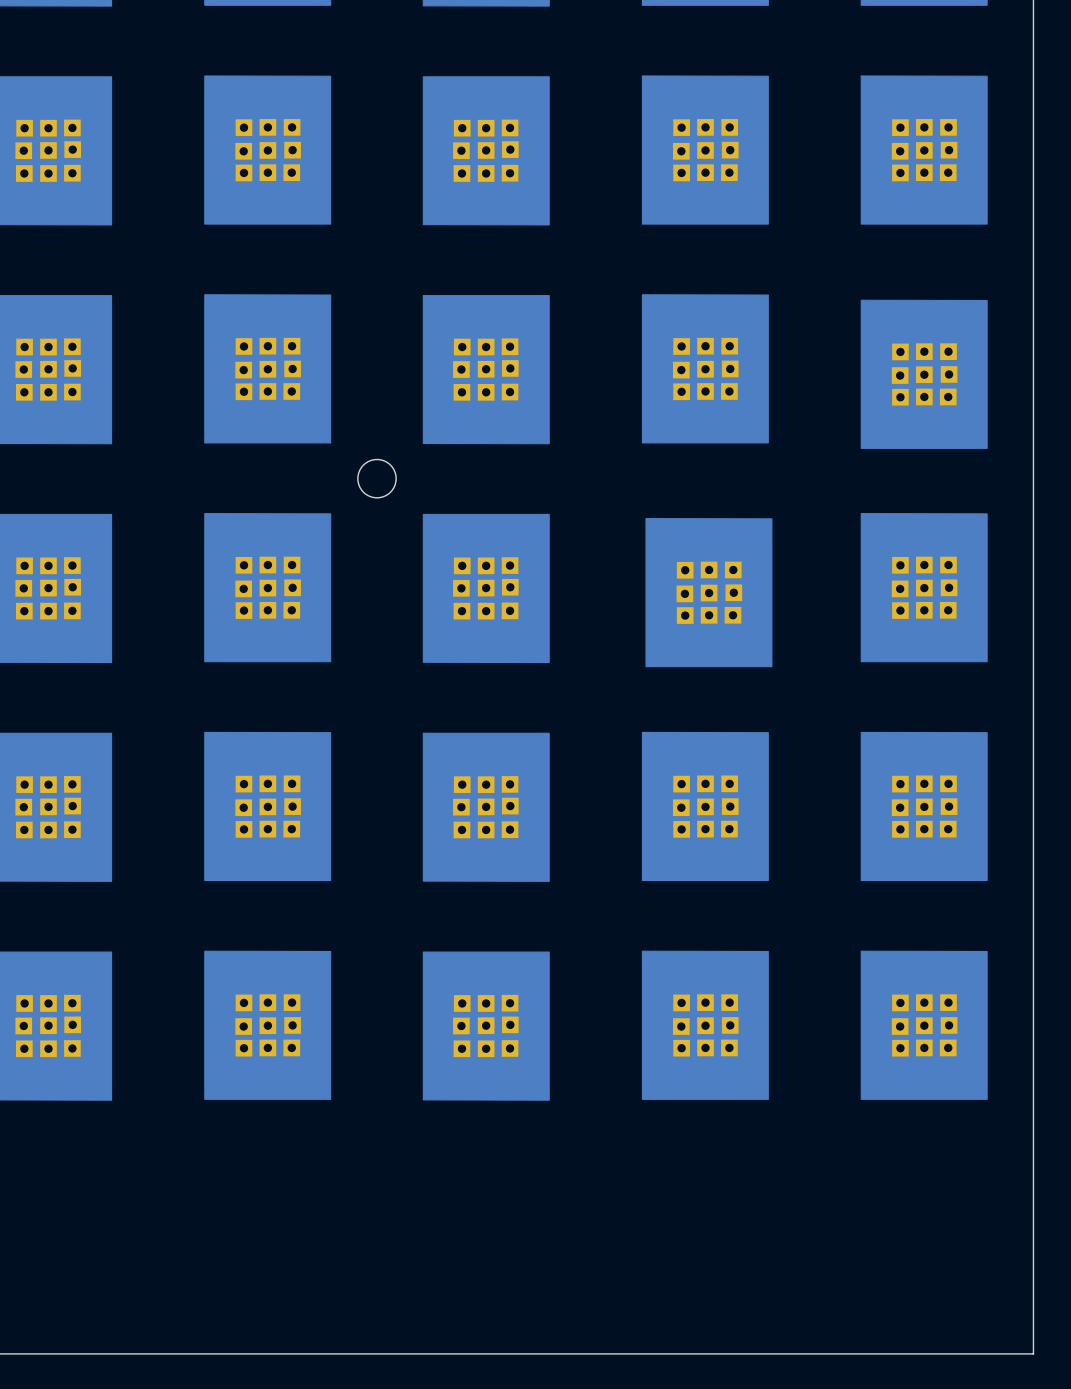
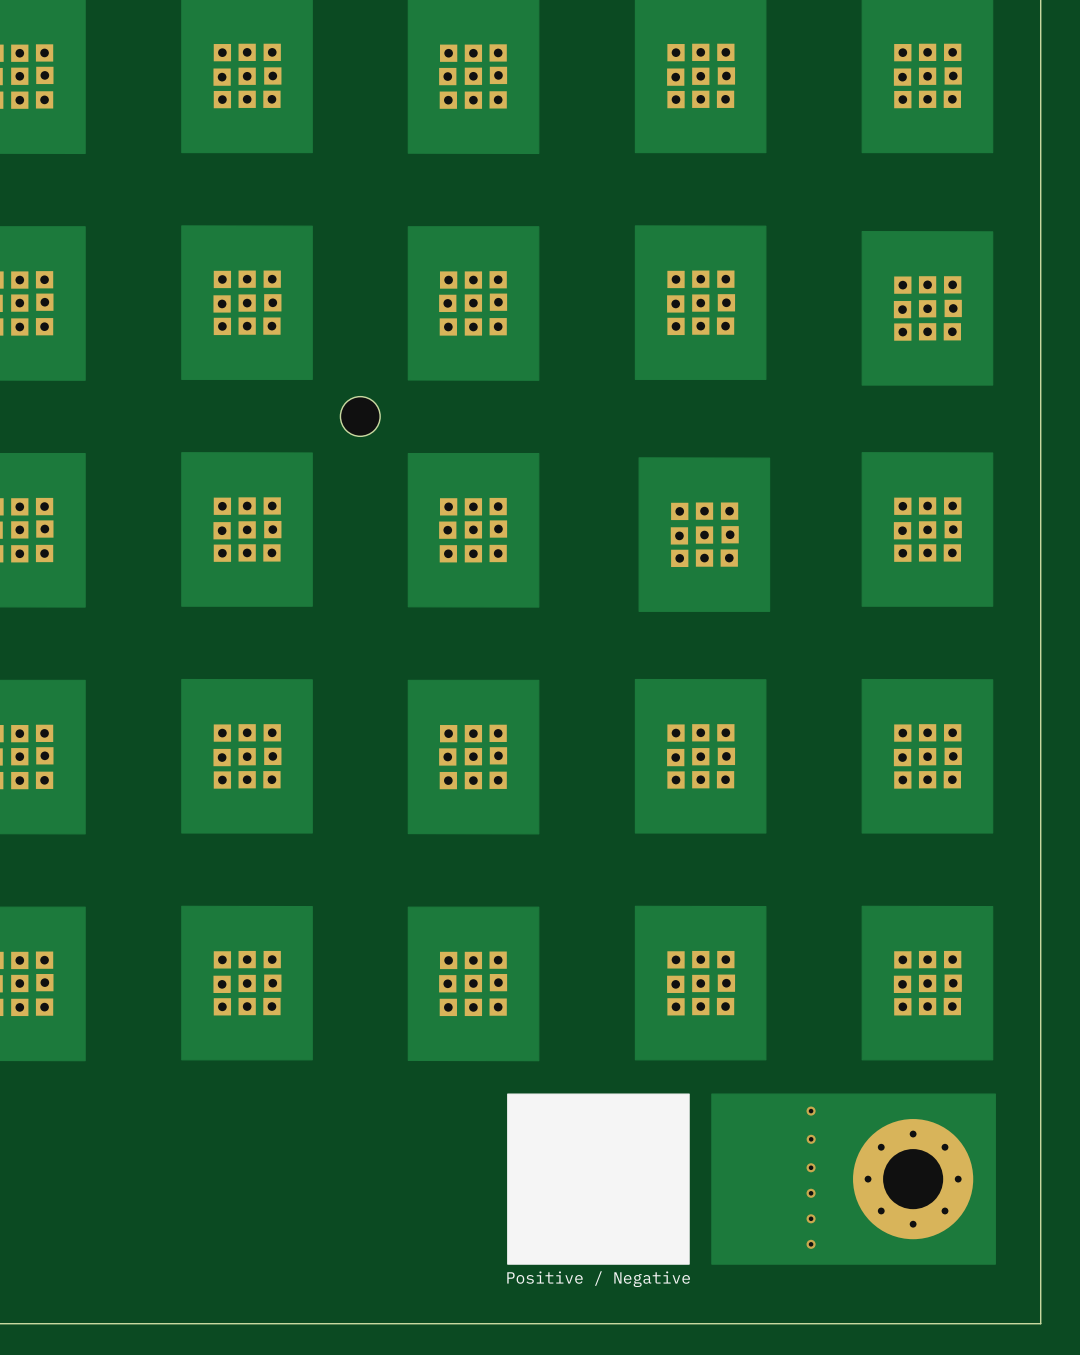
drawing: none -> [507, 1093, 690, 1265]
drawing: none -> [711, 1093, 996, 1265]
via: none -> (811, 1111)
via: none -> (811, 1139)
via: none -> (811, 1167)
part: none -> (913, 1179)
via: none -> (811, 1193)
via: none -> (811, 1218)
via: none -> (811, 1244)
text: none -> Positive / Negative (598, 1279)

